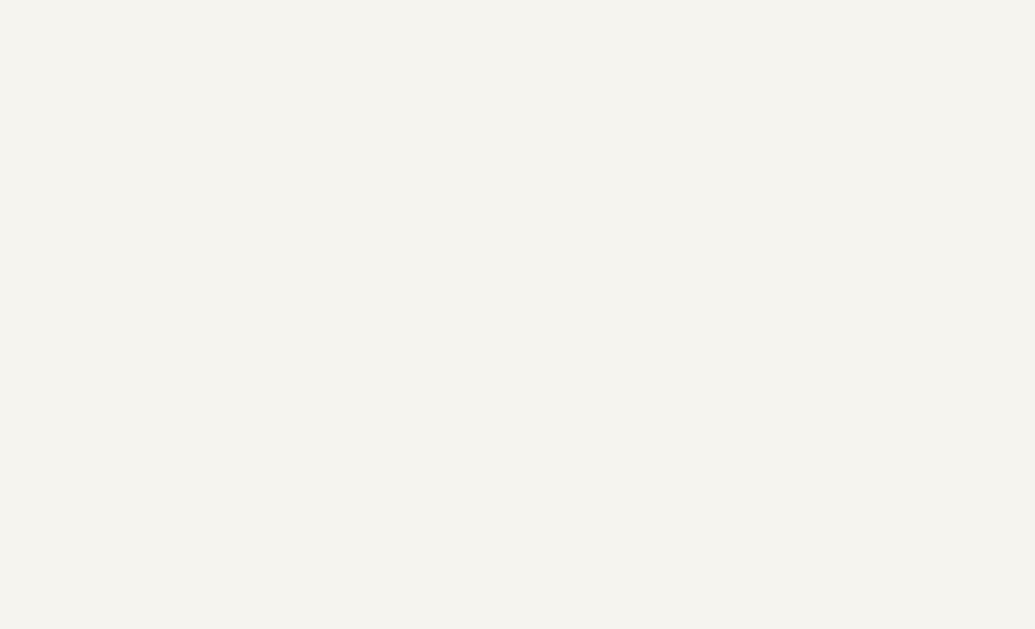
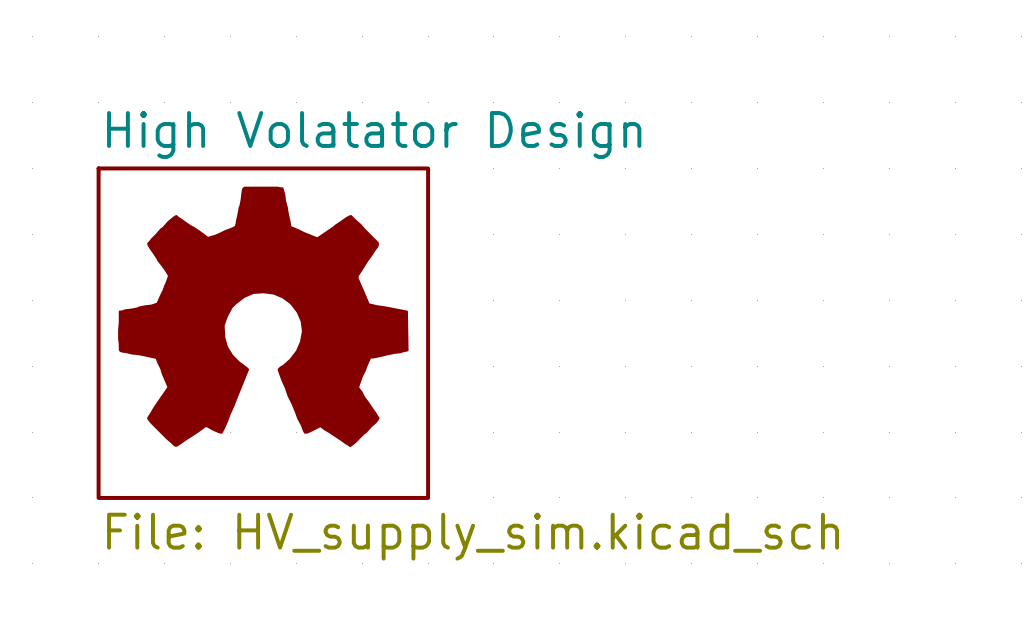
power symbol: none -> (263, 316)
sheet High Volatator Design: none -> File: HV_supply_sim.kicad_sch (263, 333)

